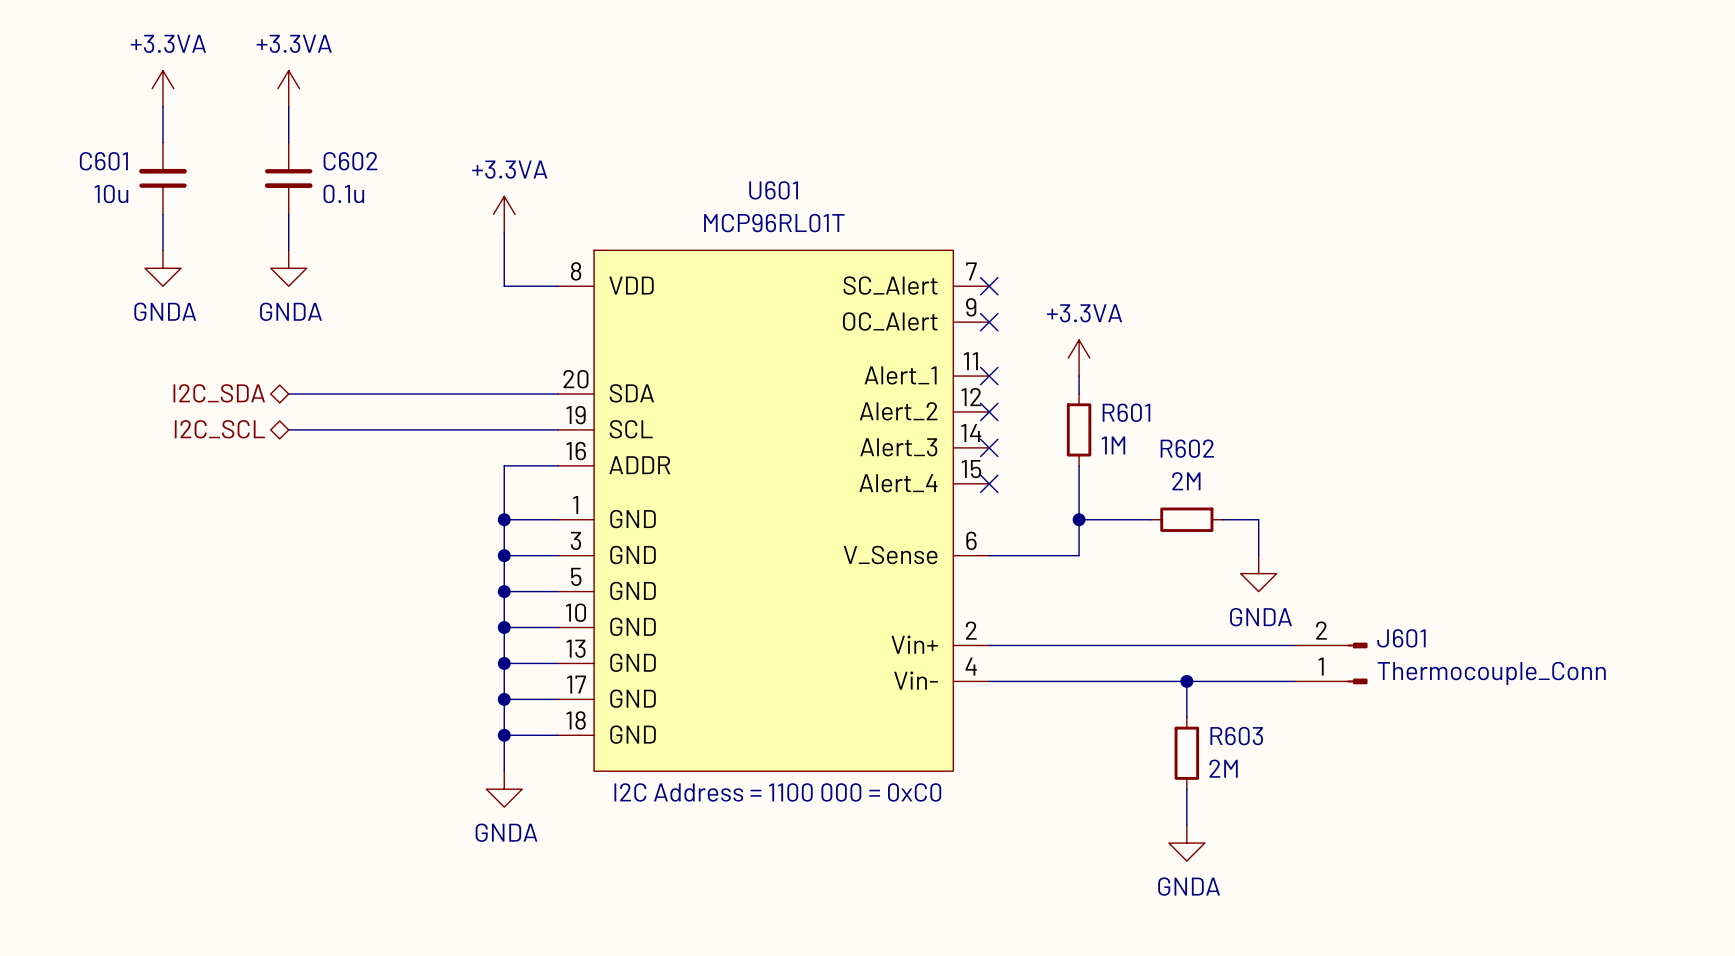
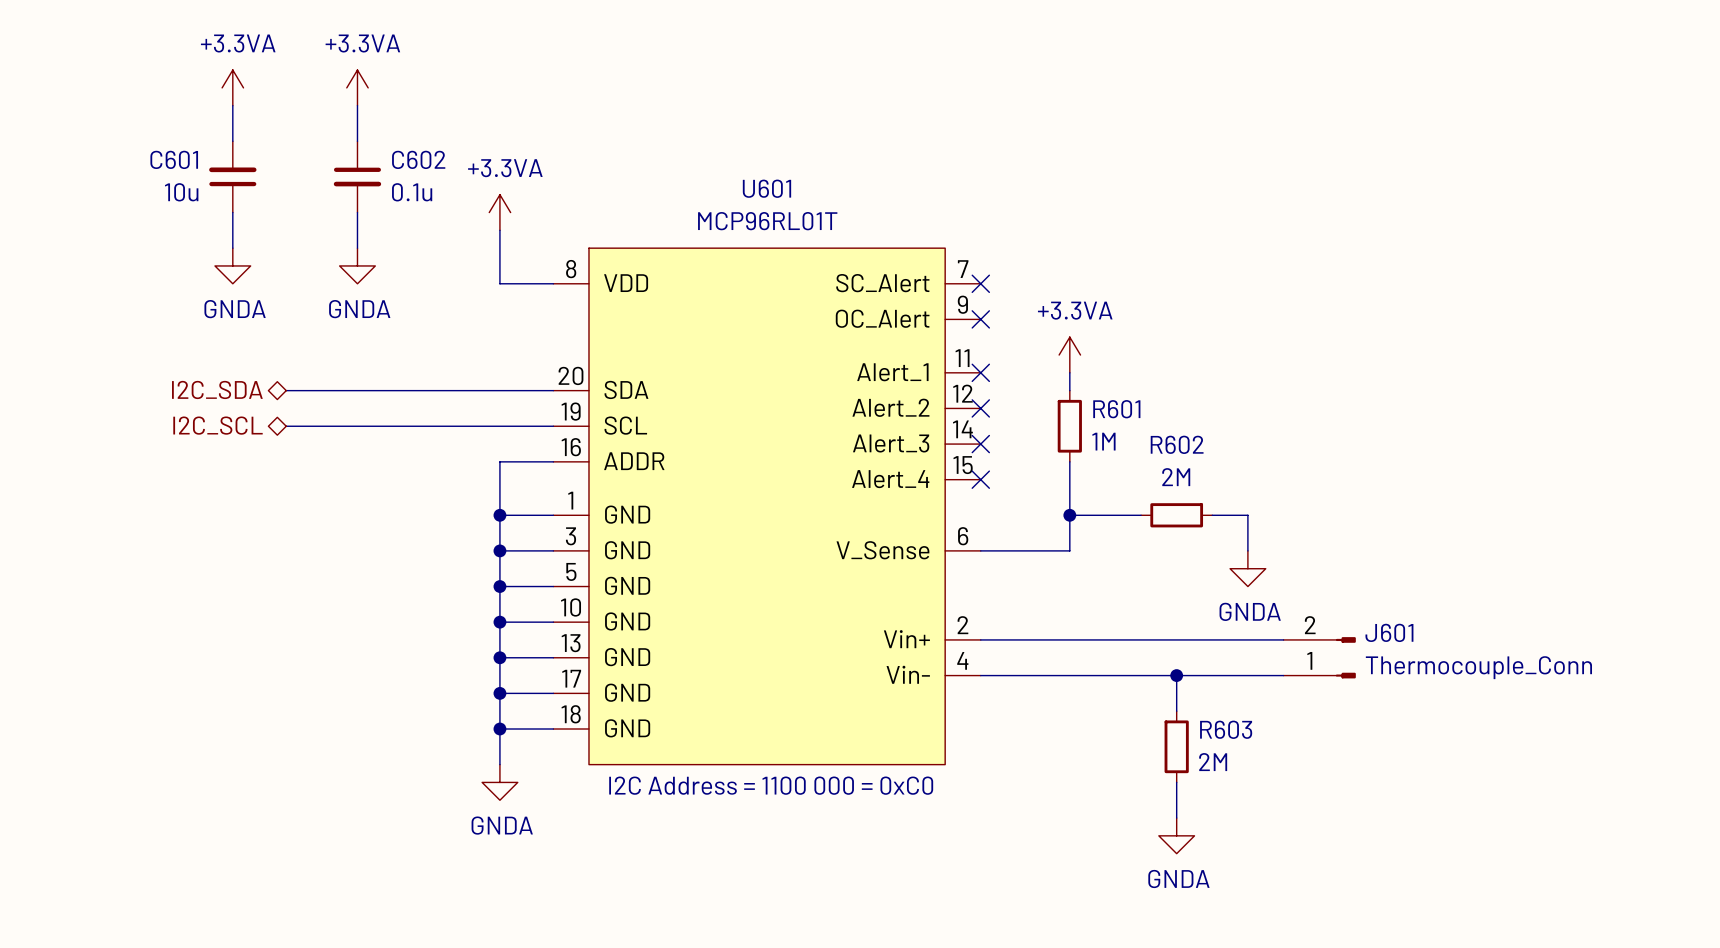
power symbol: +3.3VA (162, 88) -> none
power symbol: none -> +3.3VA (232, 87)
power symbol: +3.3VA (288, 88) -> none
power symbol: none -> +3.3VA (357, 87)
wire: (162, 106) (162, 142) -> (232, 105) (232, 141)
wire: (288, 106) (288, 142) -> (357, 105) (357, 141)
C601 position: (162, 178) -> (232, 176)
C602 position: (288, 178) -> (357, 176)
wire: (162, 214) (162, 250) -> (232, 212) (232, 248)
wire: (288, 214) (288, 250) -> (357, 212) (357, 248)
power symbol: GNDA (162, 268) -> none
power symbol: none -> GNDA (232, 265)
power symbol: GNDA (288, 268) -> none
power symbol: none -> GNDA (357, 265)

